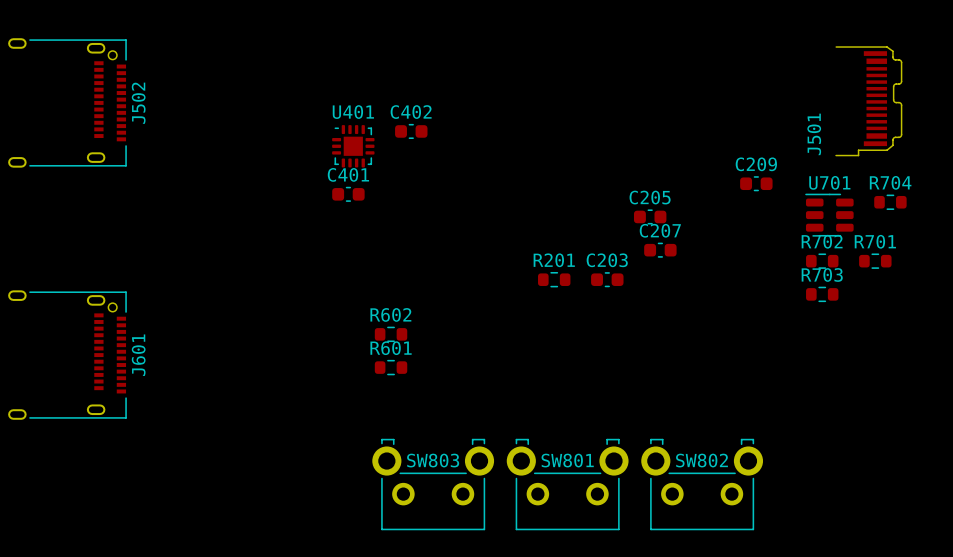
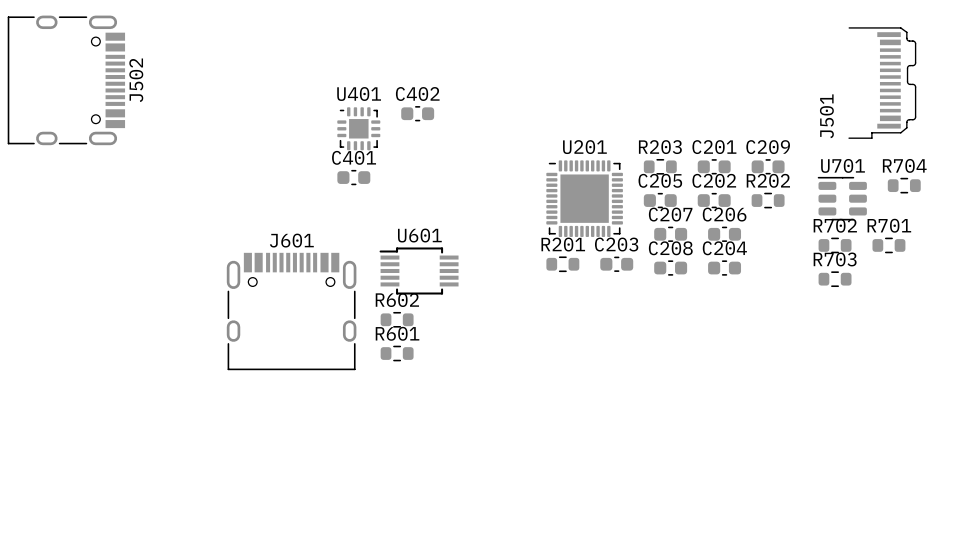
J502 footprint: [8, 38, 127, 168] -> [7, 15, 126, 146]
R203: none -> (660, 166)
C201: none -> (714, 166)
U201: none -> (584, 198)
C202: none -> (714, 200)
R202: none -> (768, 200)
C206: none -> (724, 234)
C208: none -> (670, 268)
C204: none -> (724, 268)
U601: none -> (419, 270)
J601 footprint: [8, 290, 127, 420] -> [226, 252, 357, 371]
J601 name position: J601 (138, 355) -> J601 (291, 240)
SW803: (433, 484) -> none
SW801: (567, 484) -> none
SW802: (702, 484) -> none

